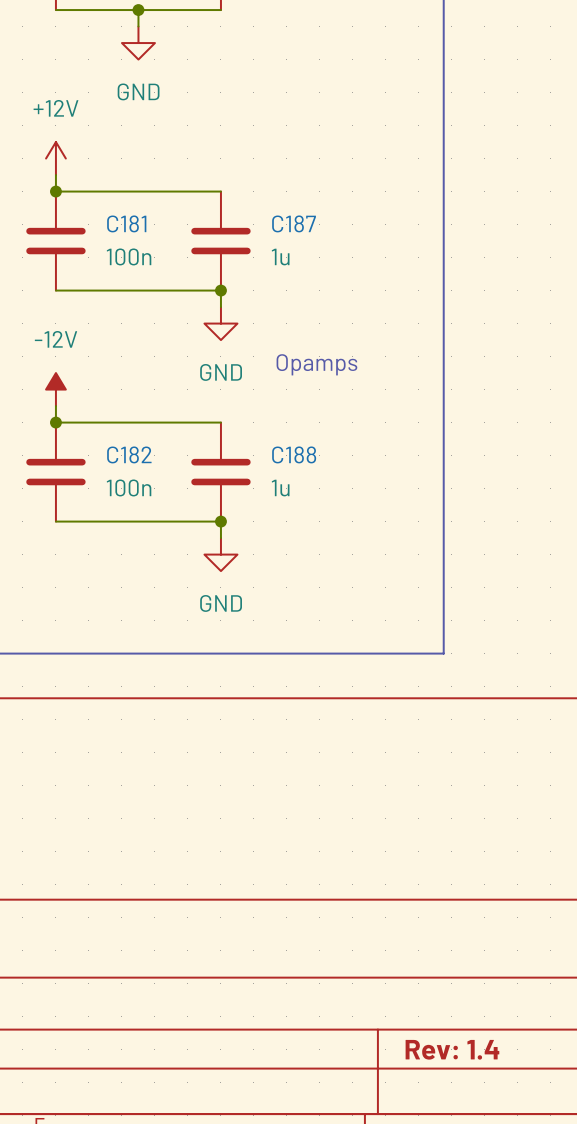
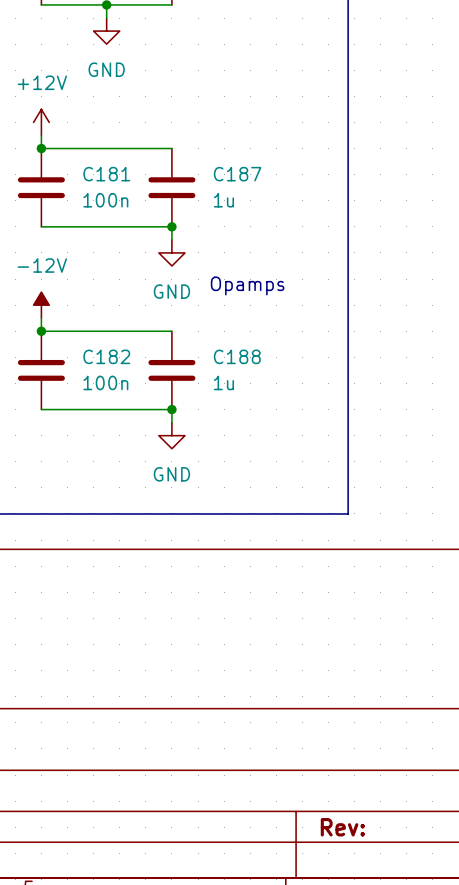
title block: Rev: 1.4 (452, 1049) -> Rev: (342, 827)

